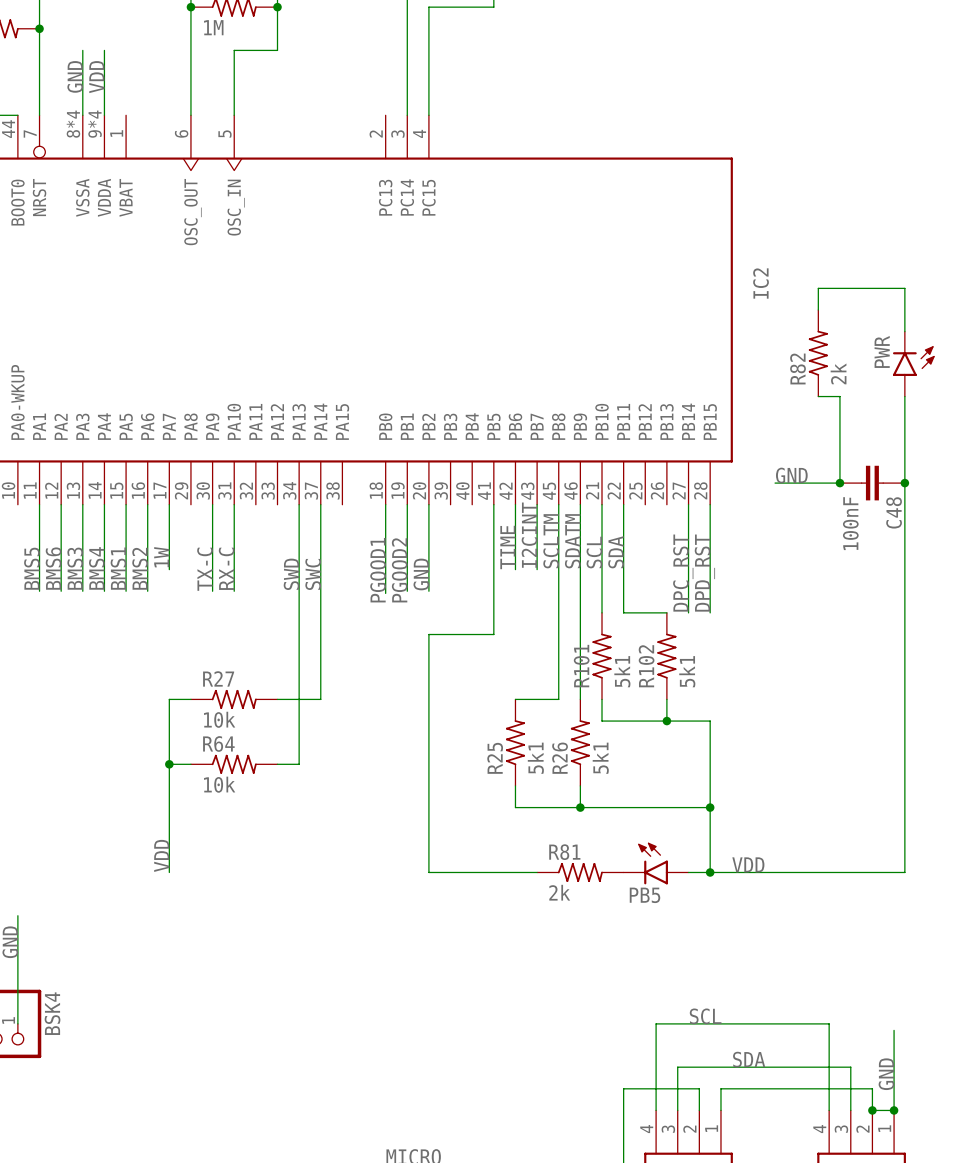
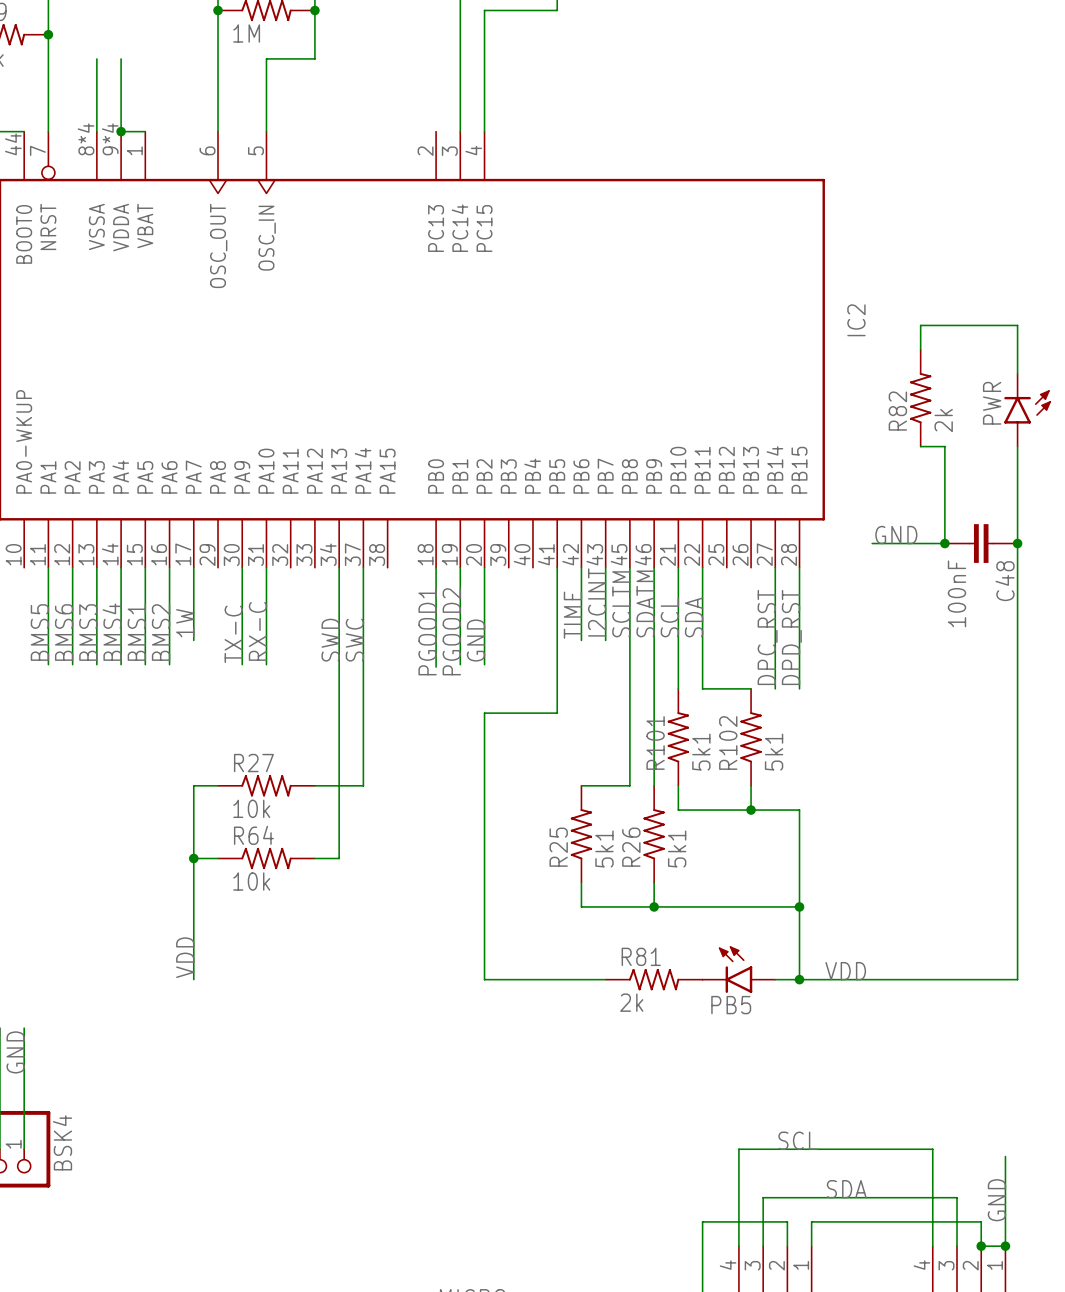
label: GND (75, 76) -> none
label: VDD (96, 77) -> none
wire: none -> (121, 131) (145, 131)
junction: none -> (121, 131)

